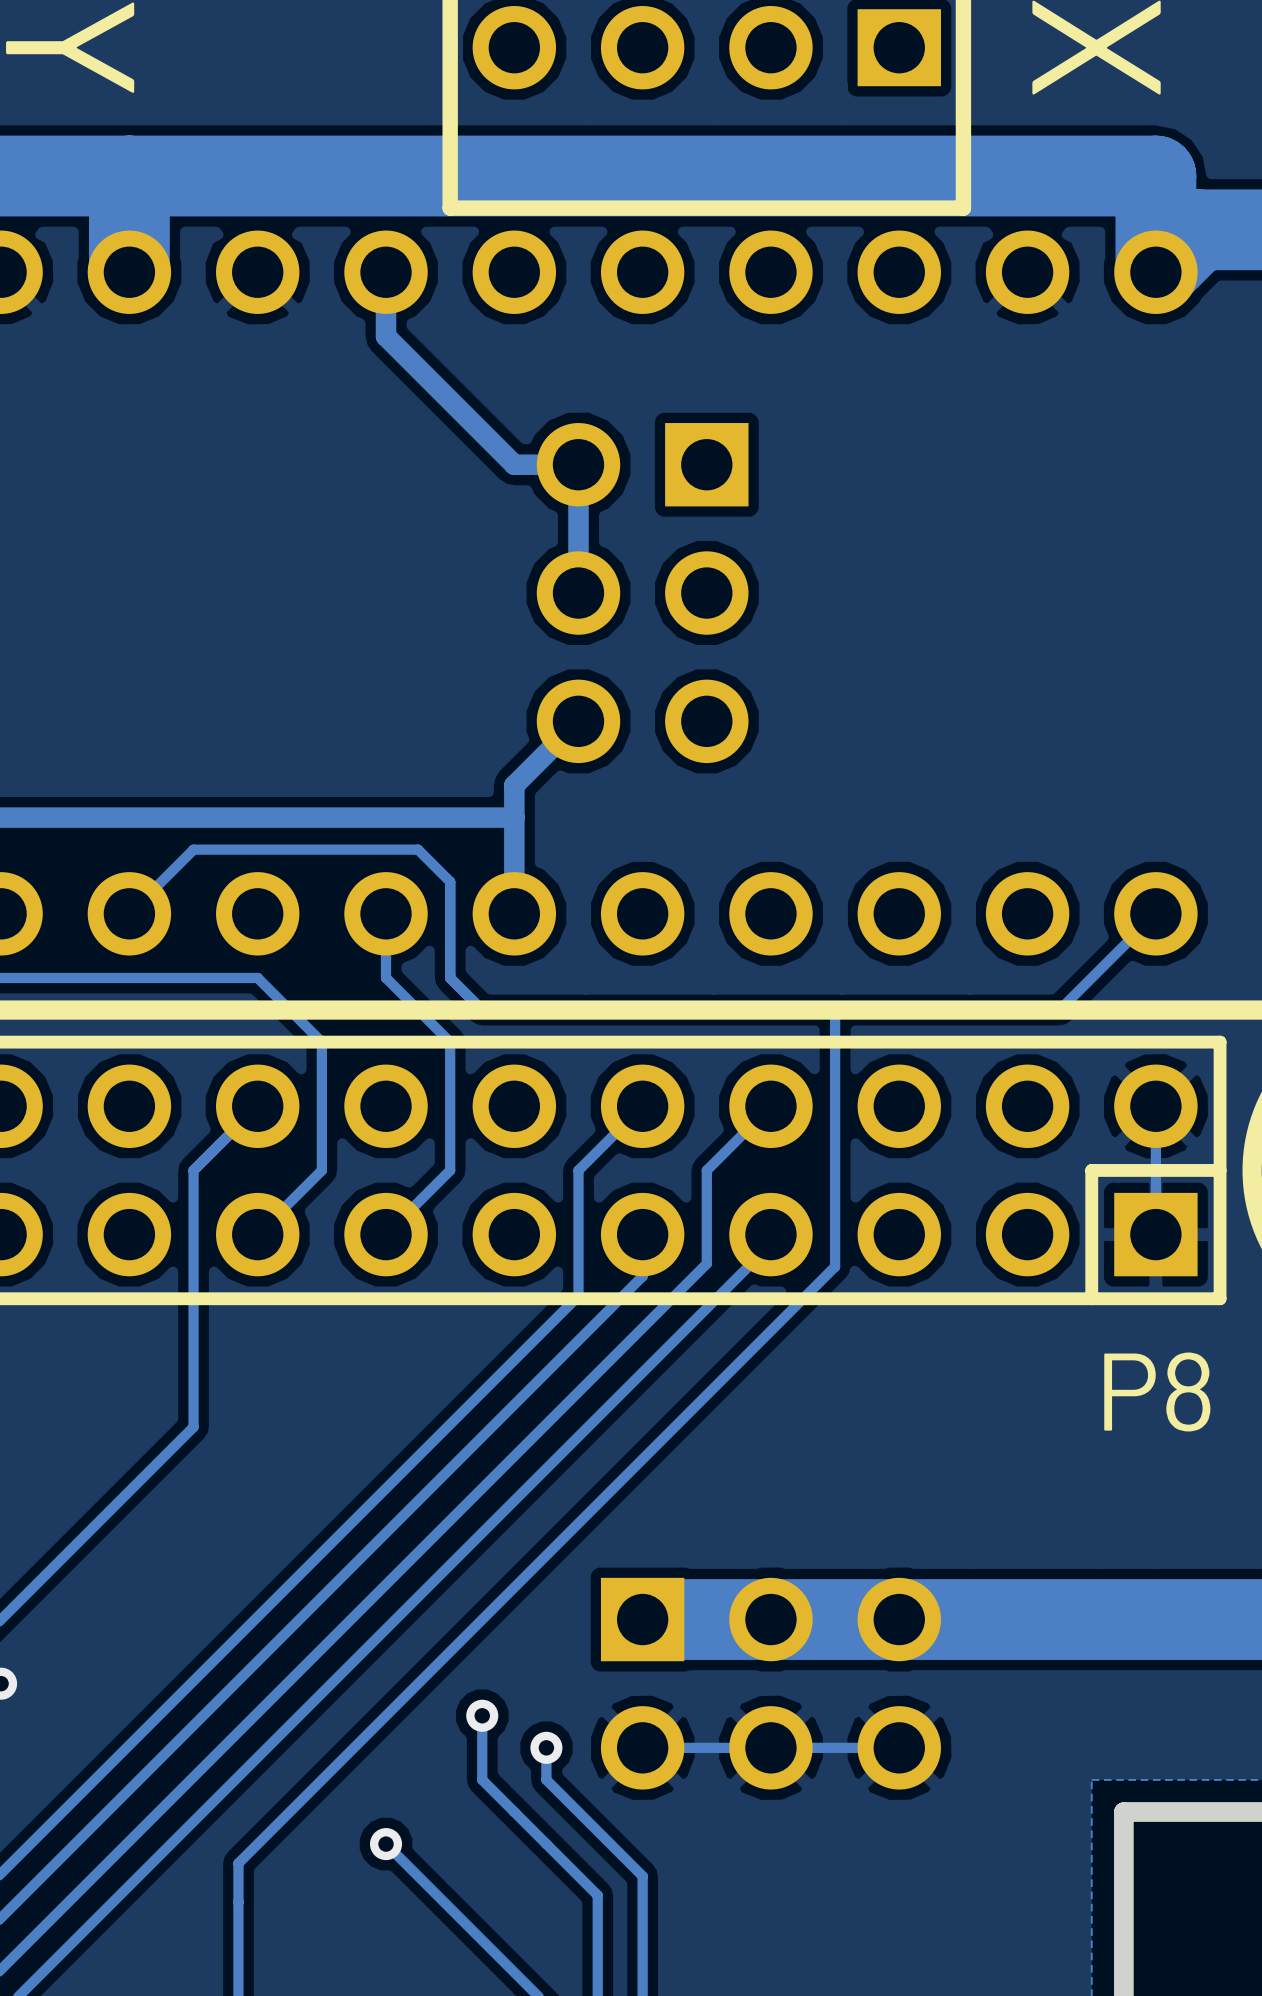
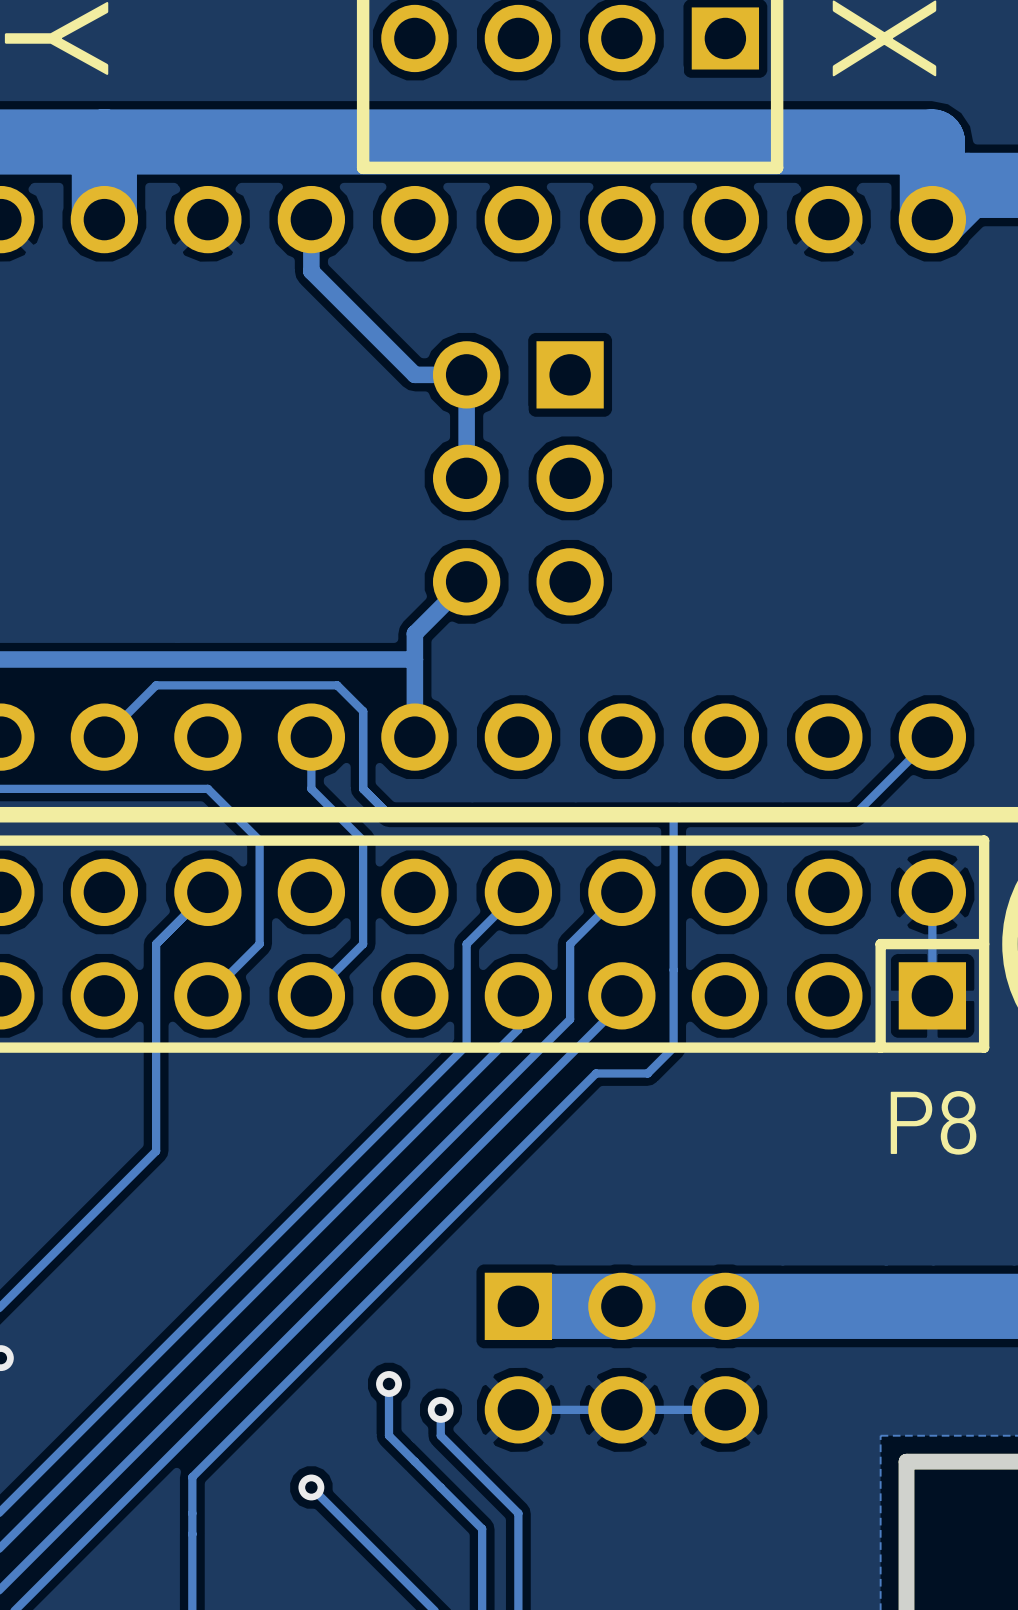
track: (835, 1266) (238, 1863) -> (673, 1021) (673, 1047) (647, 1073) (596, 1073) (192, 1477) (192, 1503)

